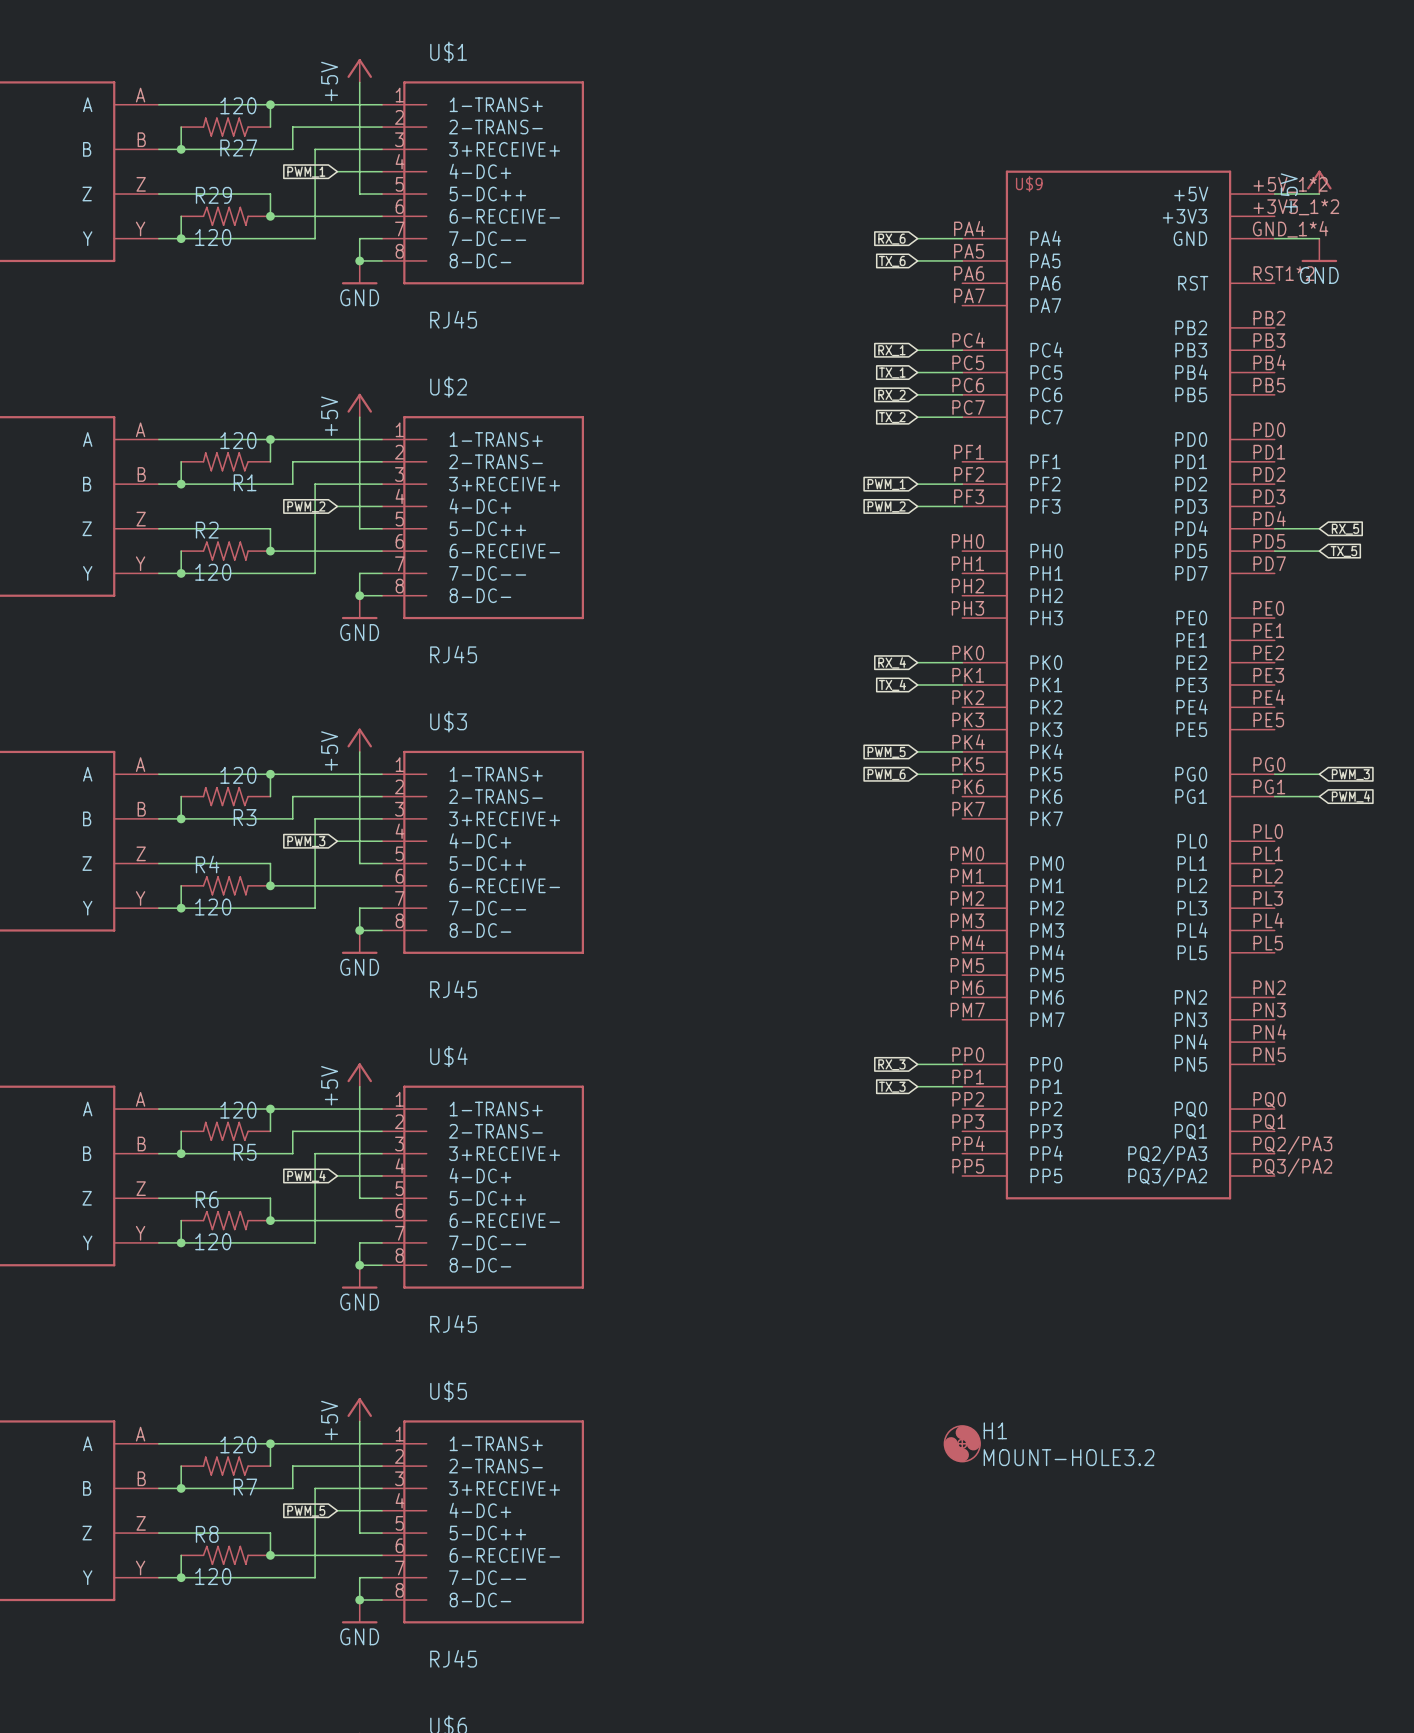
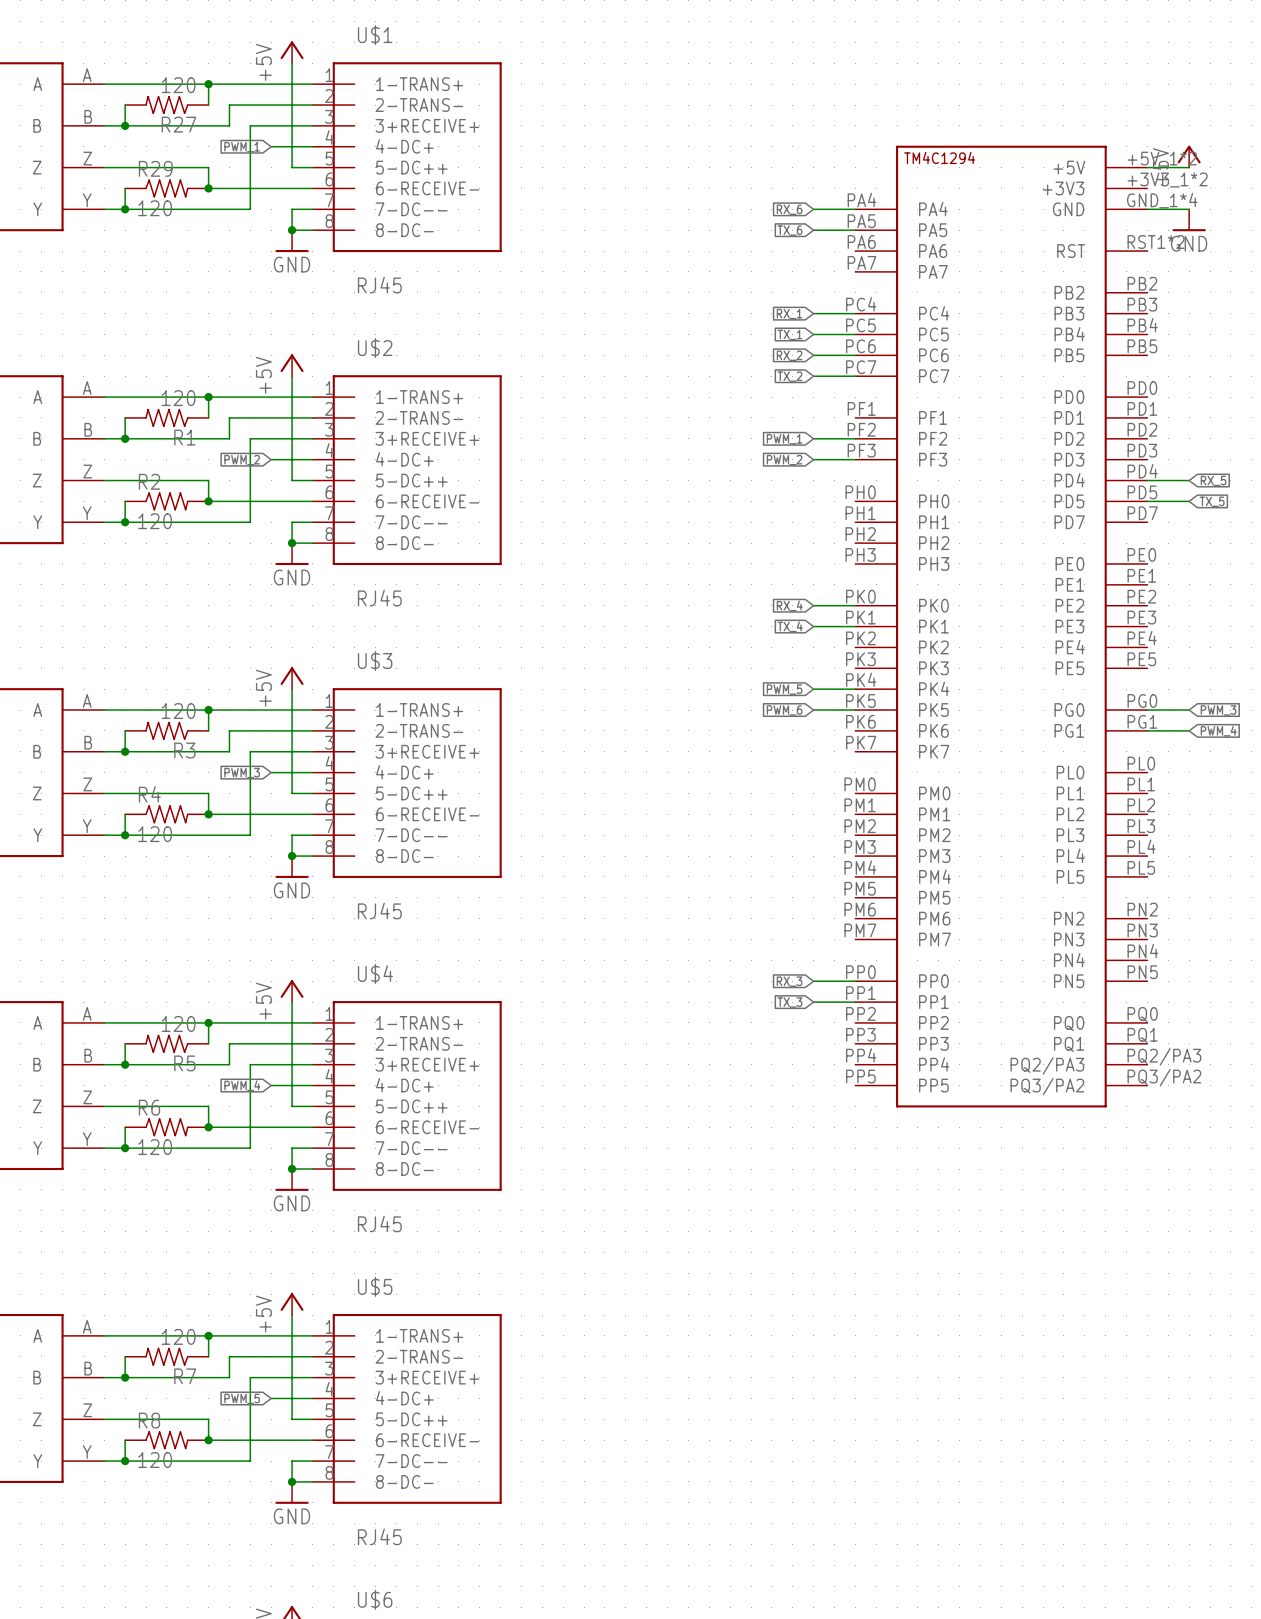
U$9 name: U$9 (1029, 183) -> none
U$9 text: none -> TM4C1294 (939, 157)
H1: MOUNT-HOLE3.2 (962, 1443) -> none

